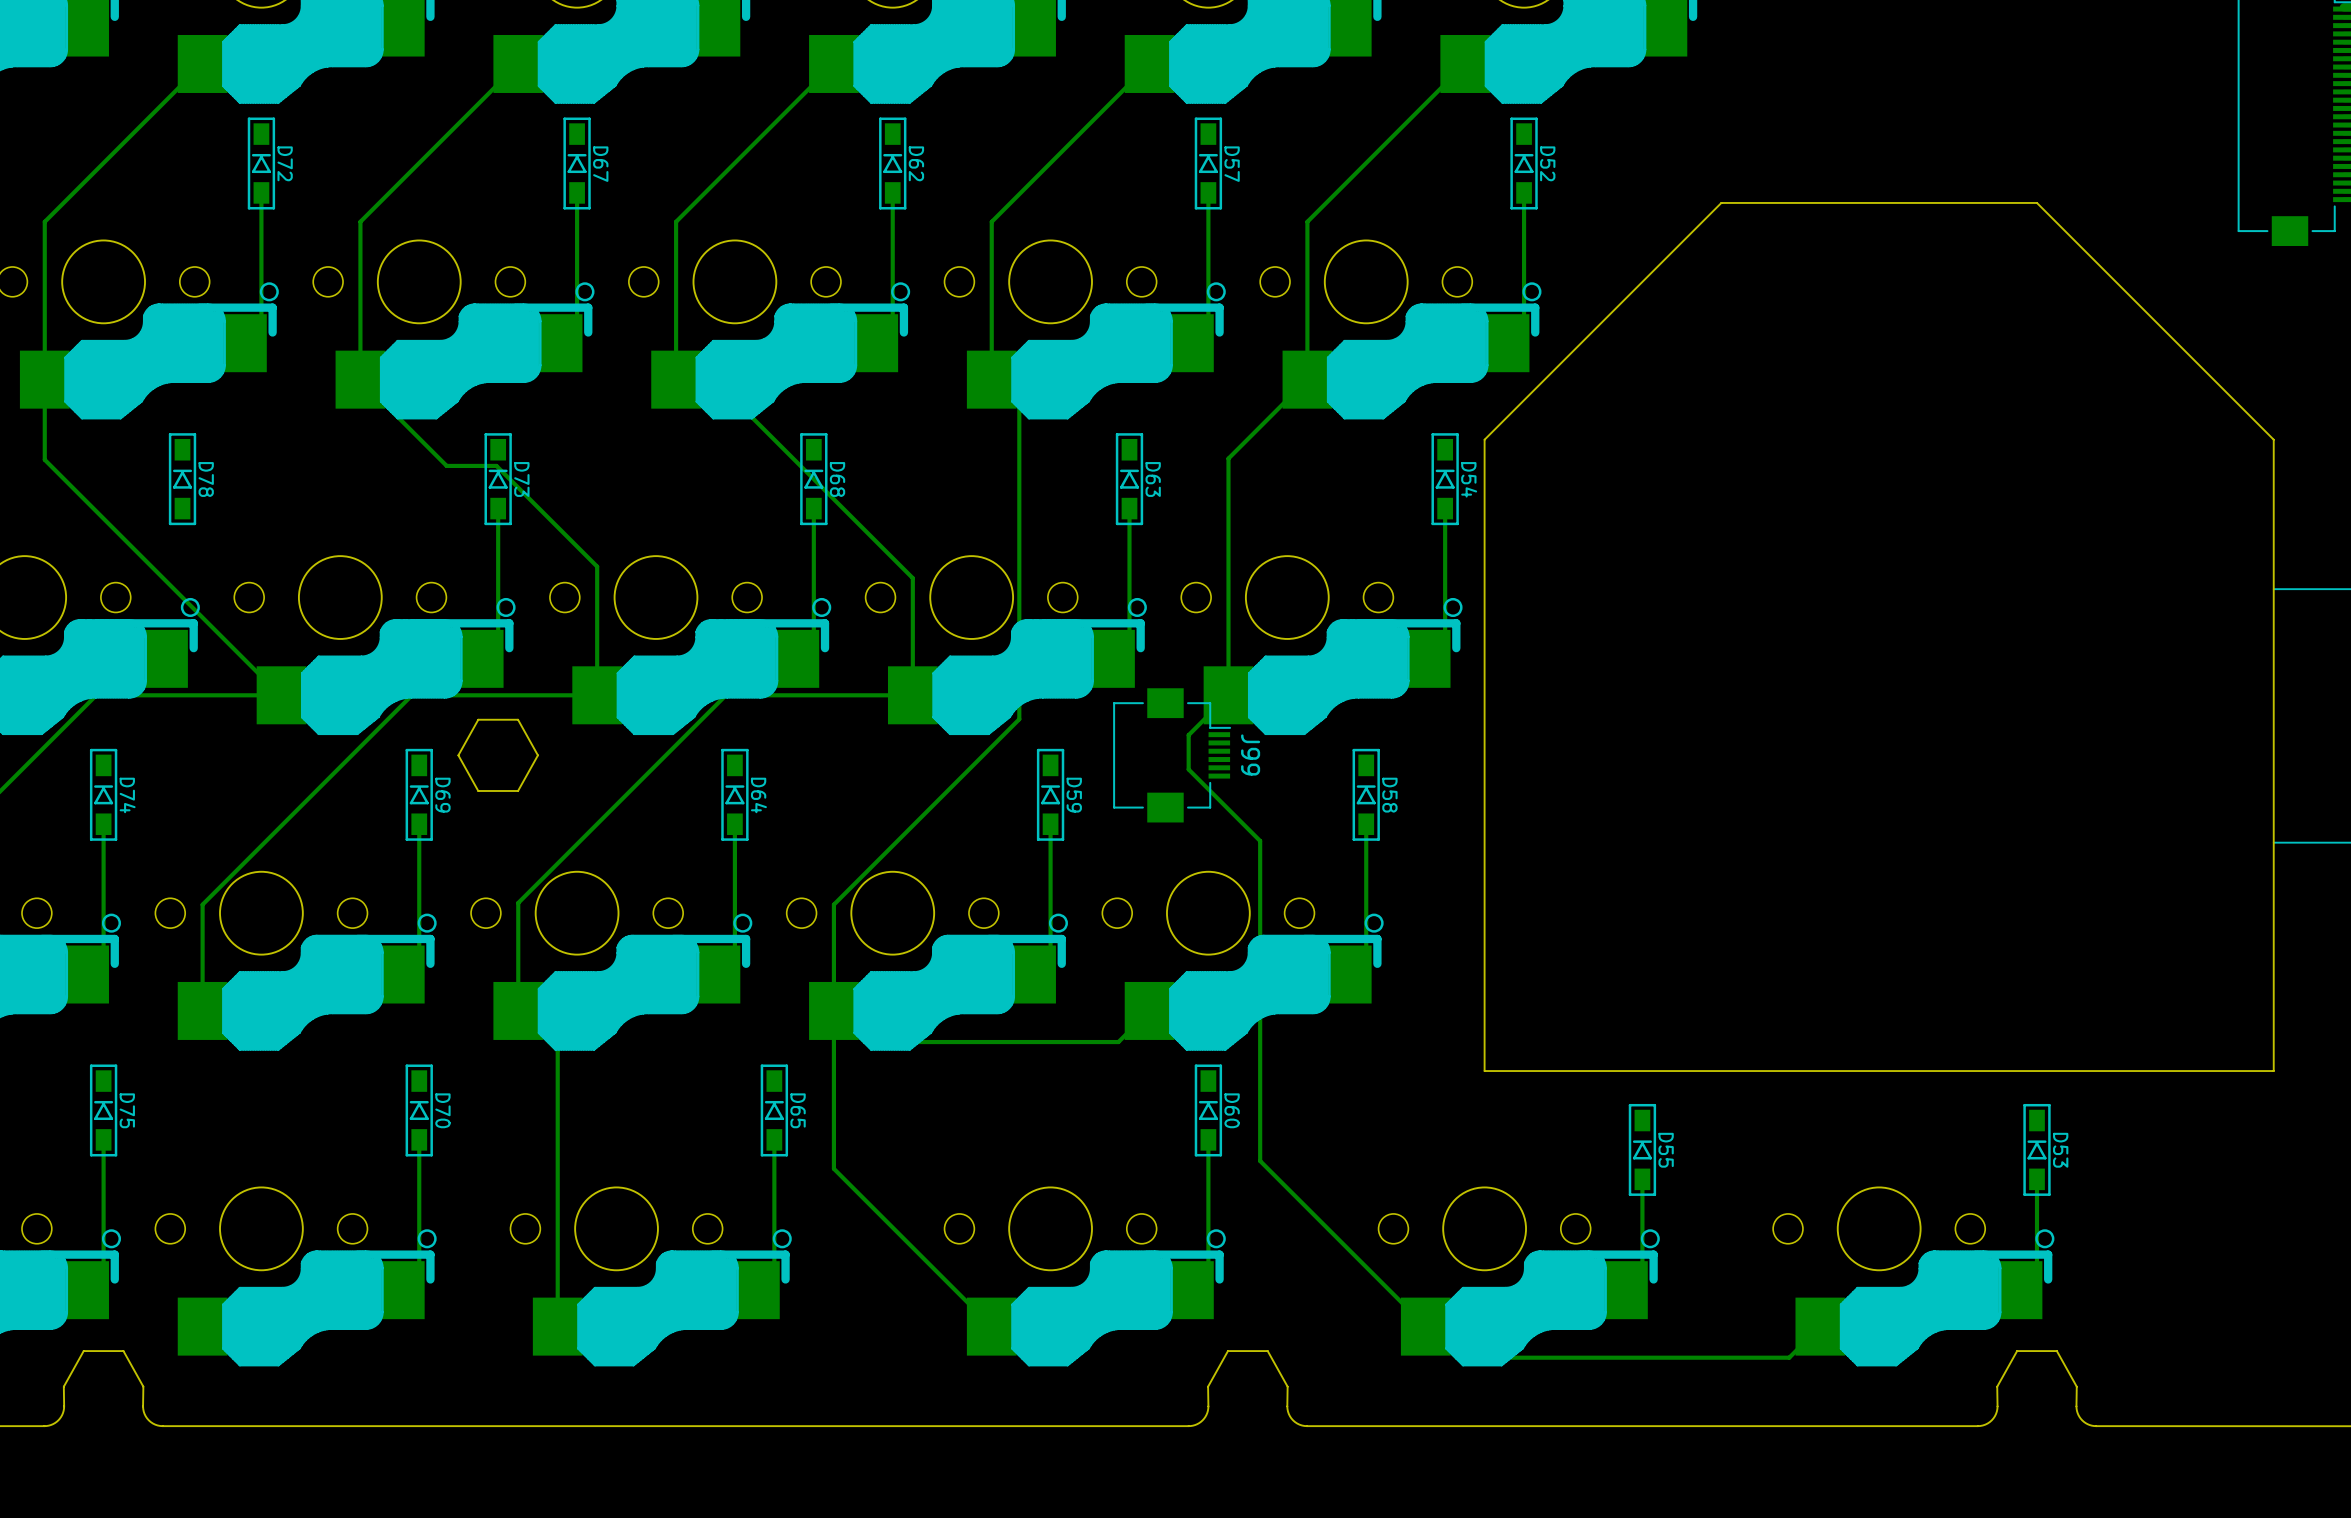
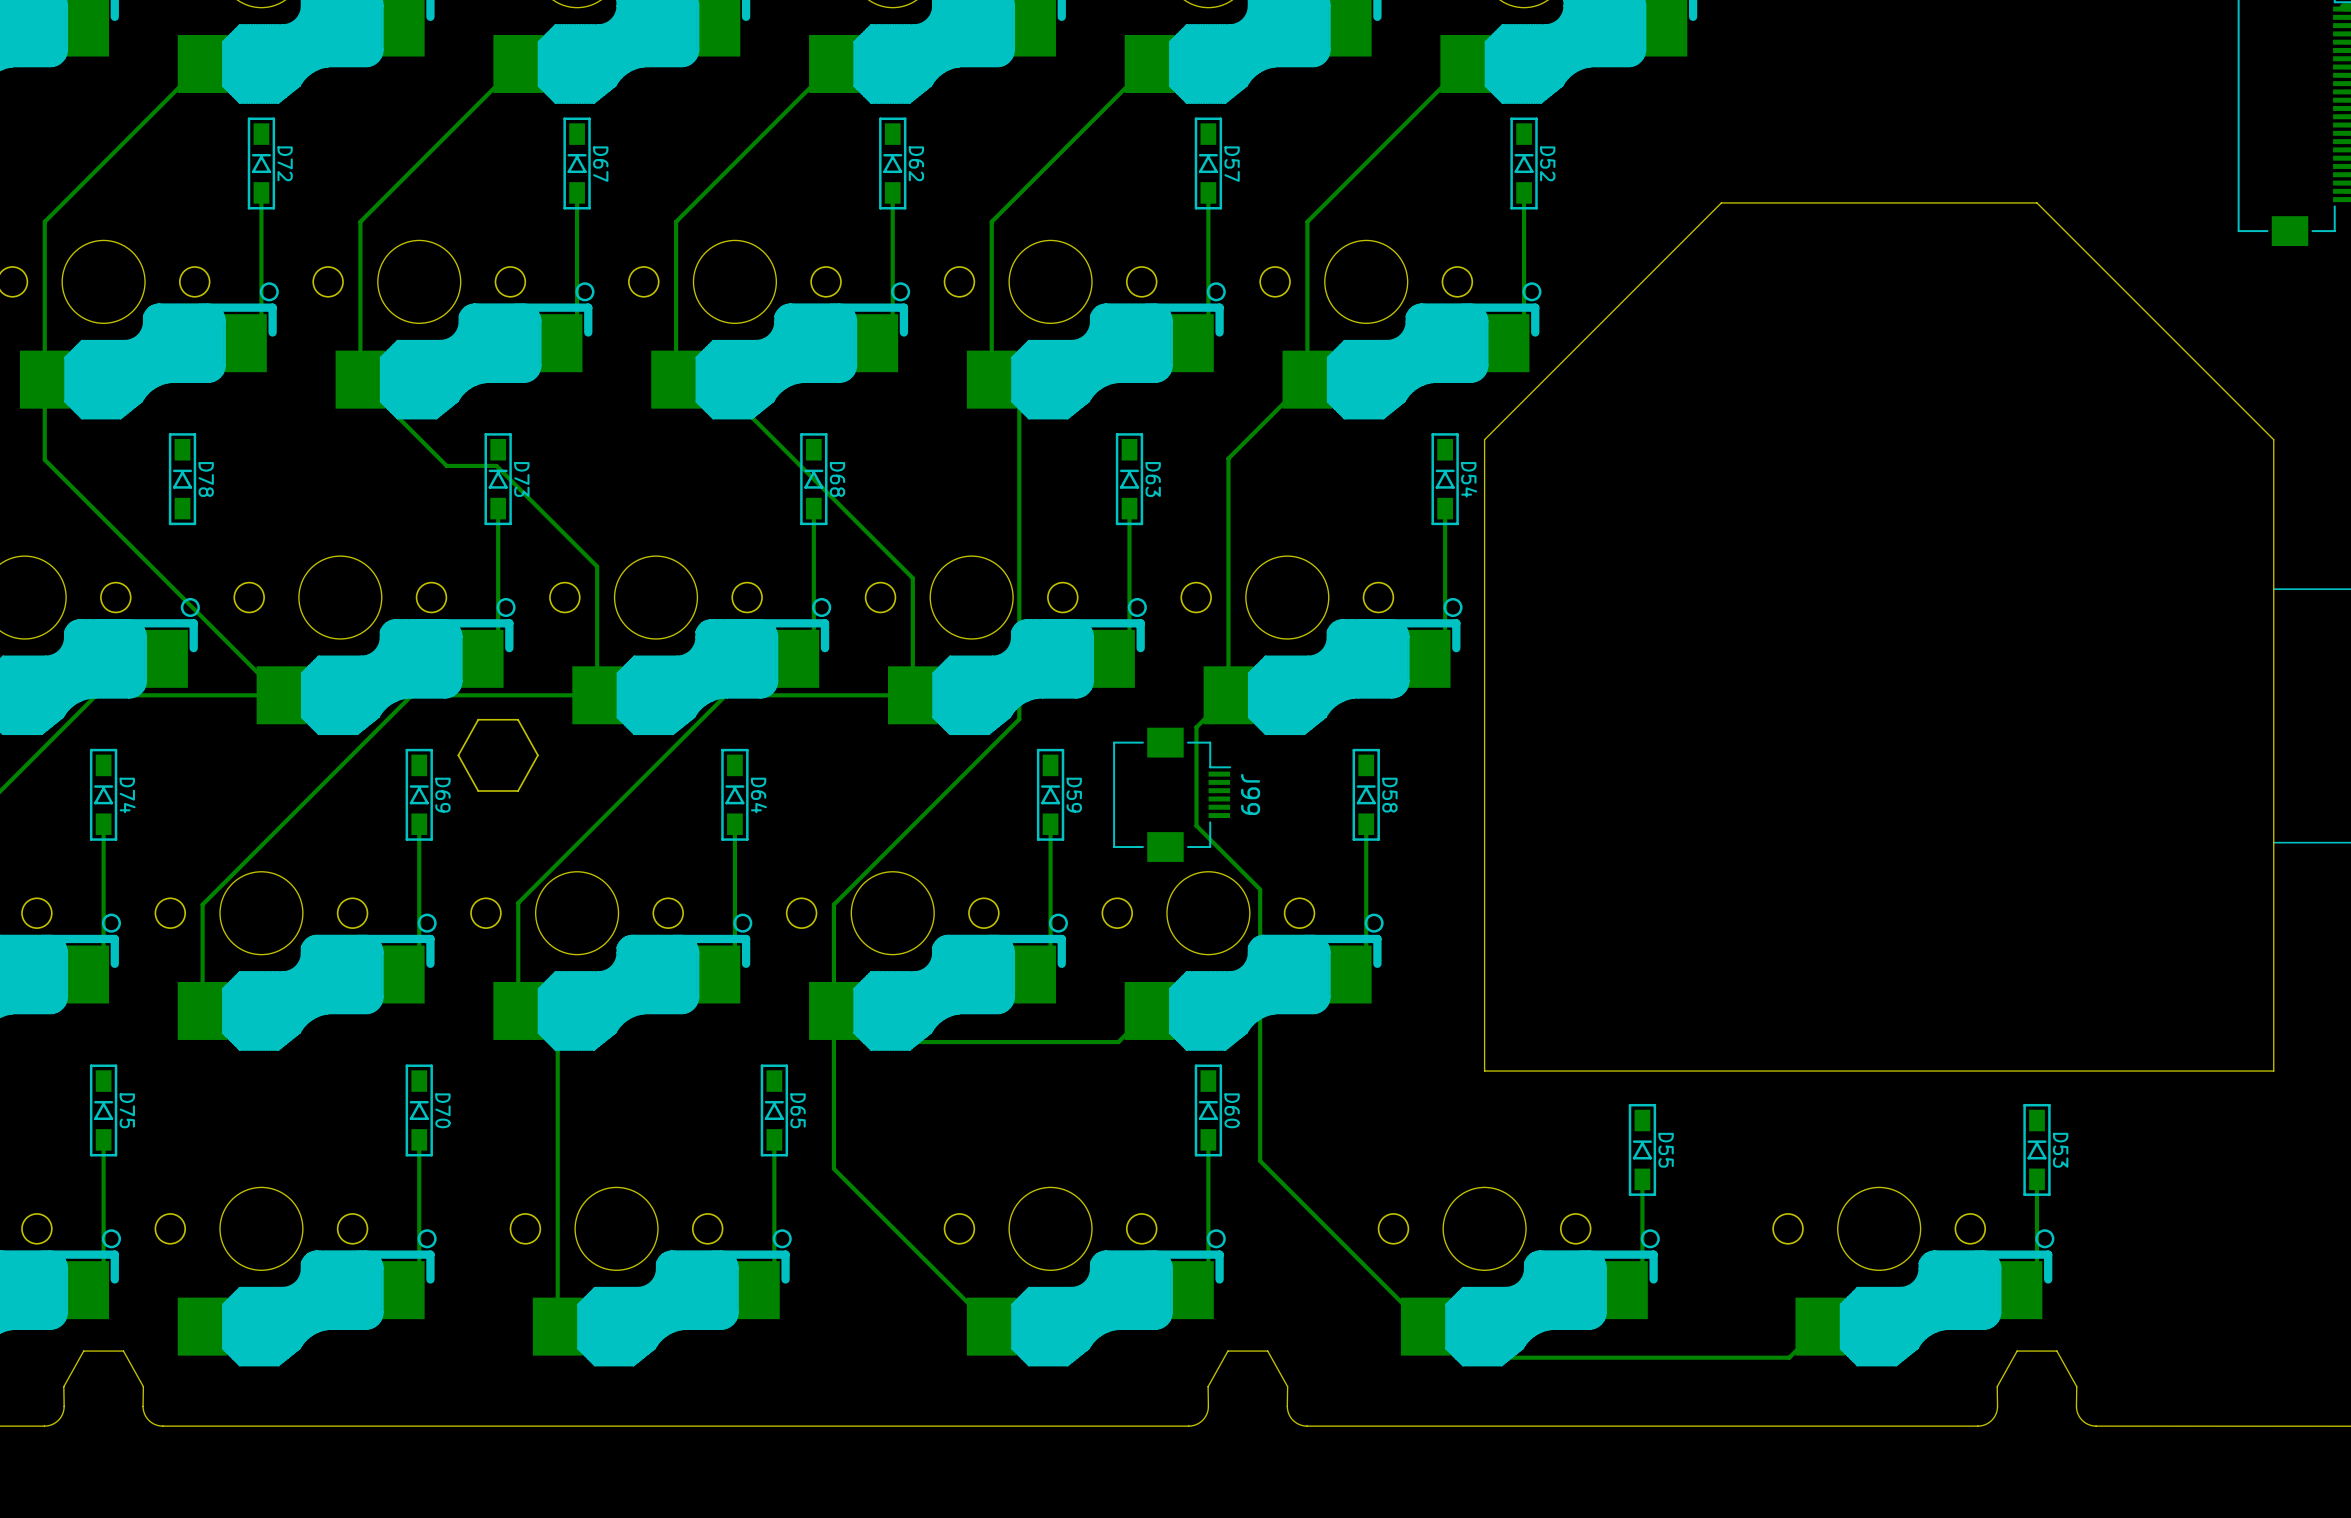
bottom track: (1196, 727) (1188, 735) (1188, 769) (1260, 840) (1260, 889) -> (1196, 727) (1196, 825) (1260, 889)
J99 position: (1172, 755) -> (1172, 794)

